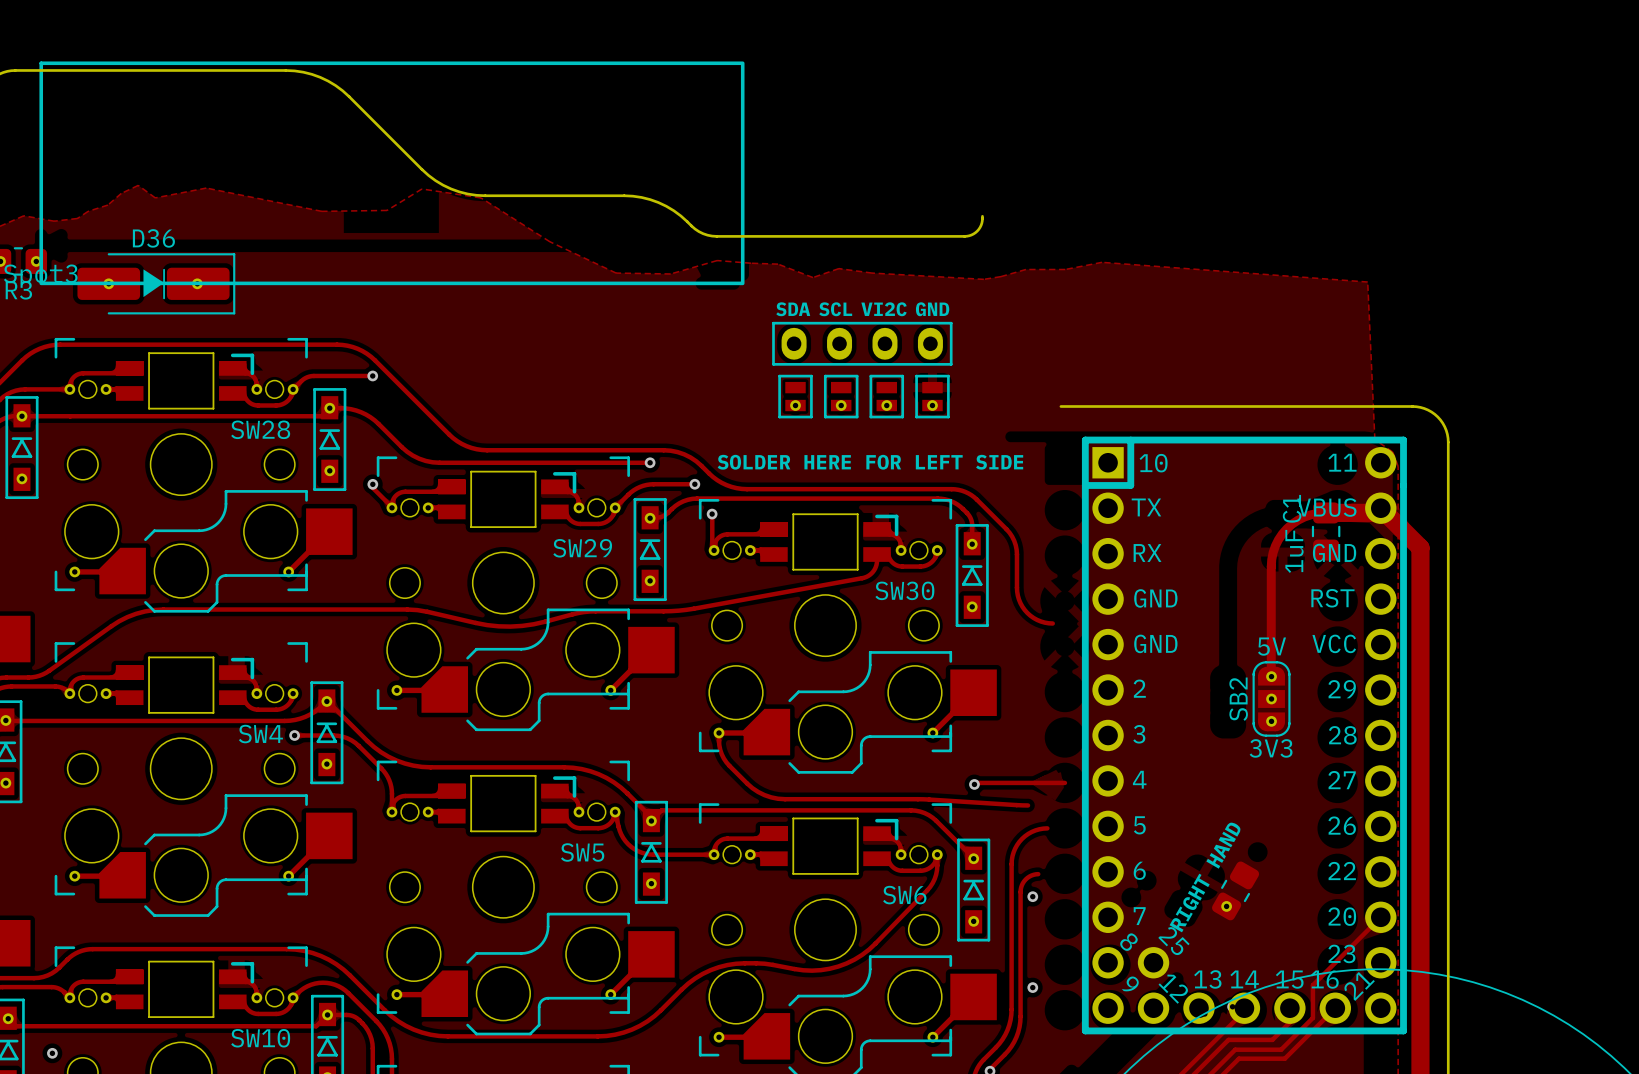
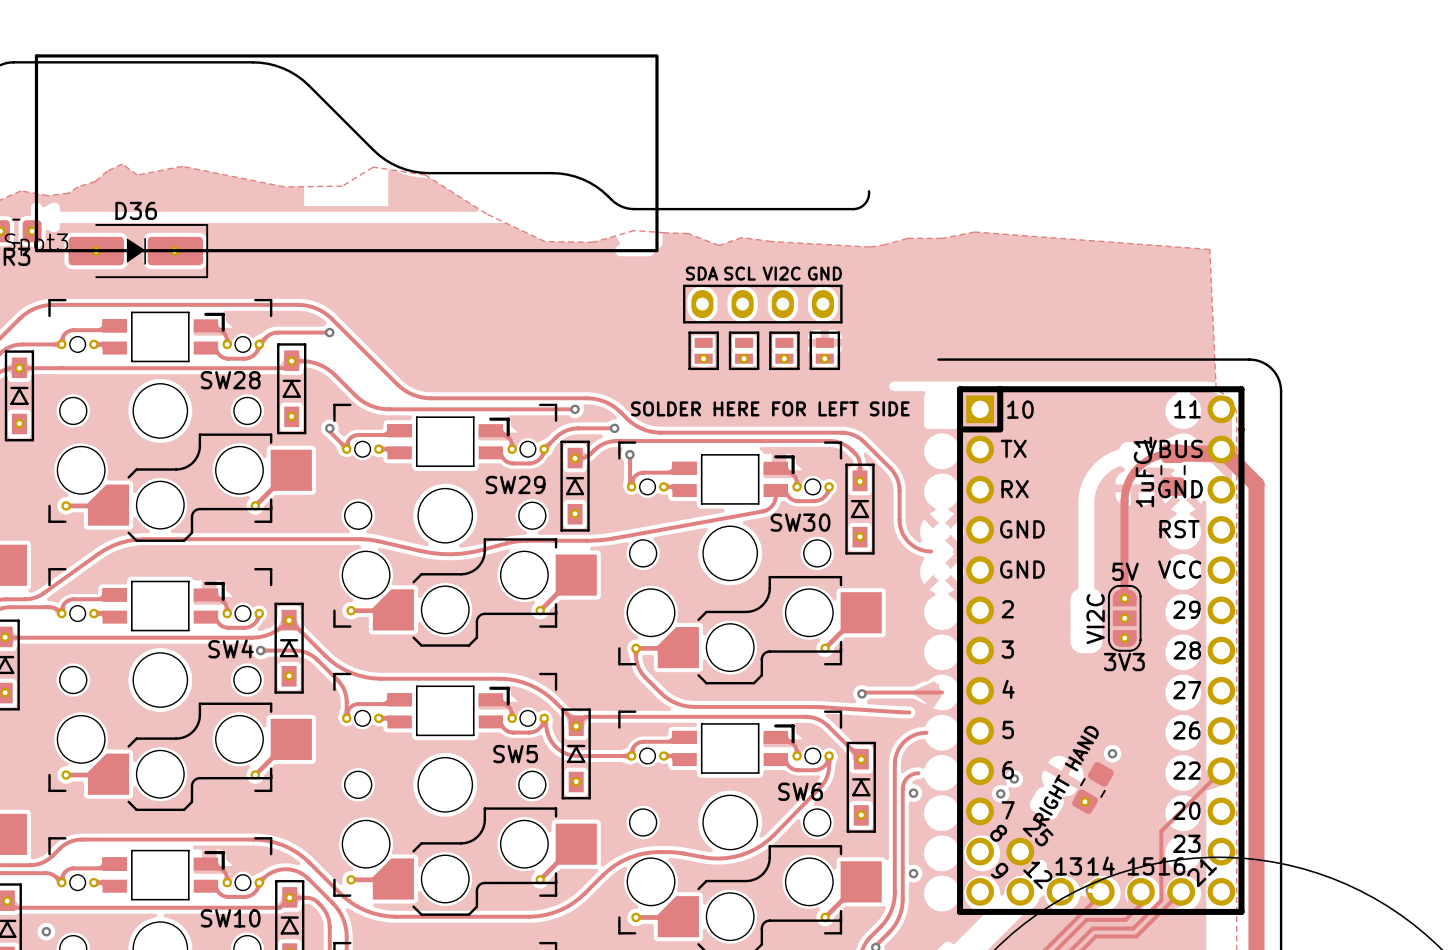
SB2 name: SB2 (1238, 699) -> VI2C (1095, 619)
via: none -> (1112, 753)
via: none -> (1014, 778)
via: none -> (1000, 793)
track: (1380, 917) (1312, 985) -> (1221, 771) (1161, 831) (1161, 871)

